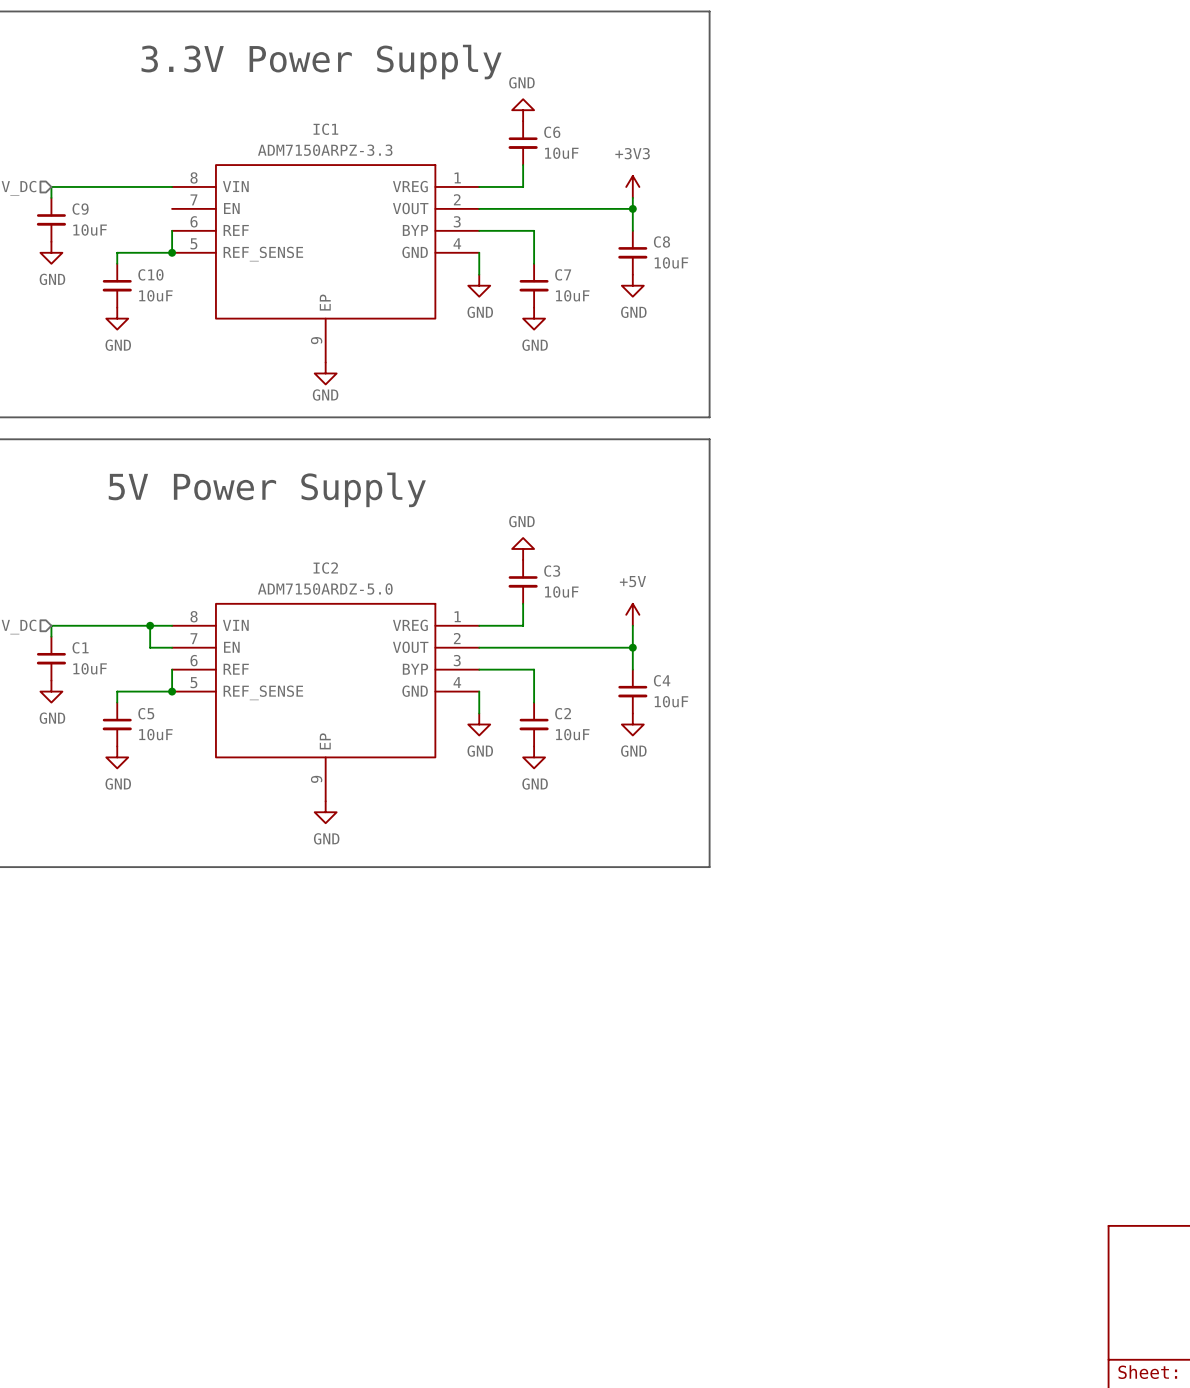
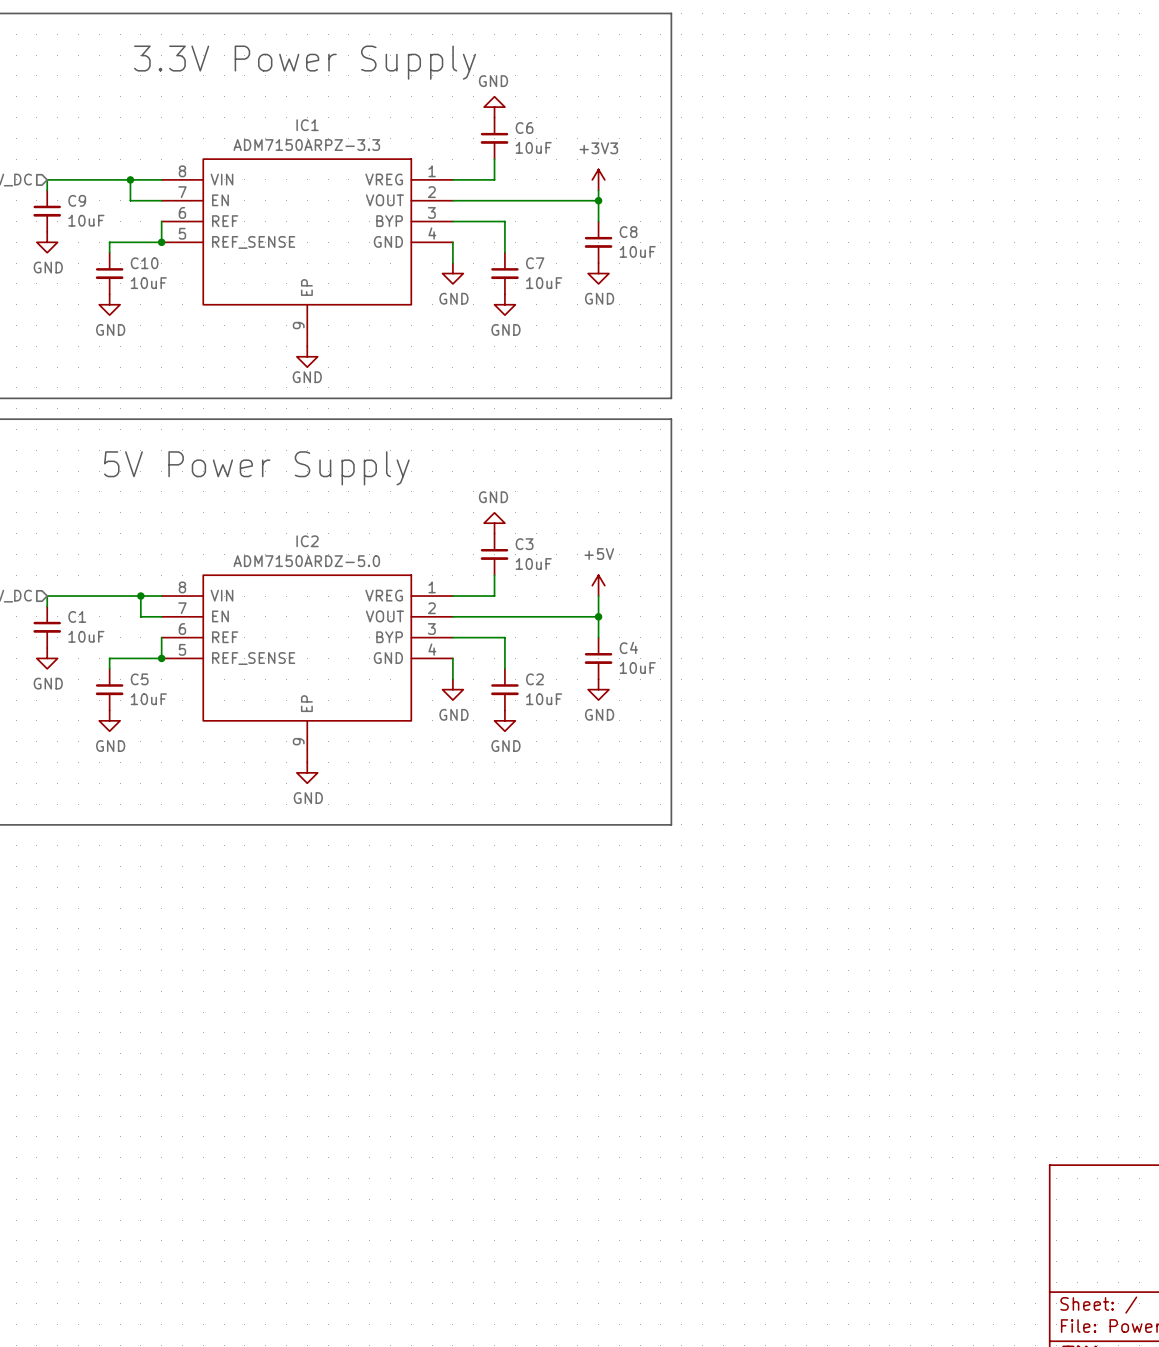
wire: none -> (130, 179) (130, 200) (161, 200)
junction: none -> (130, 179)

